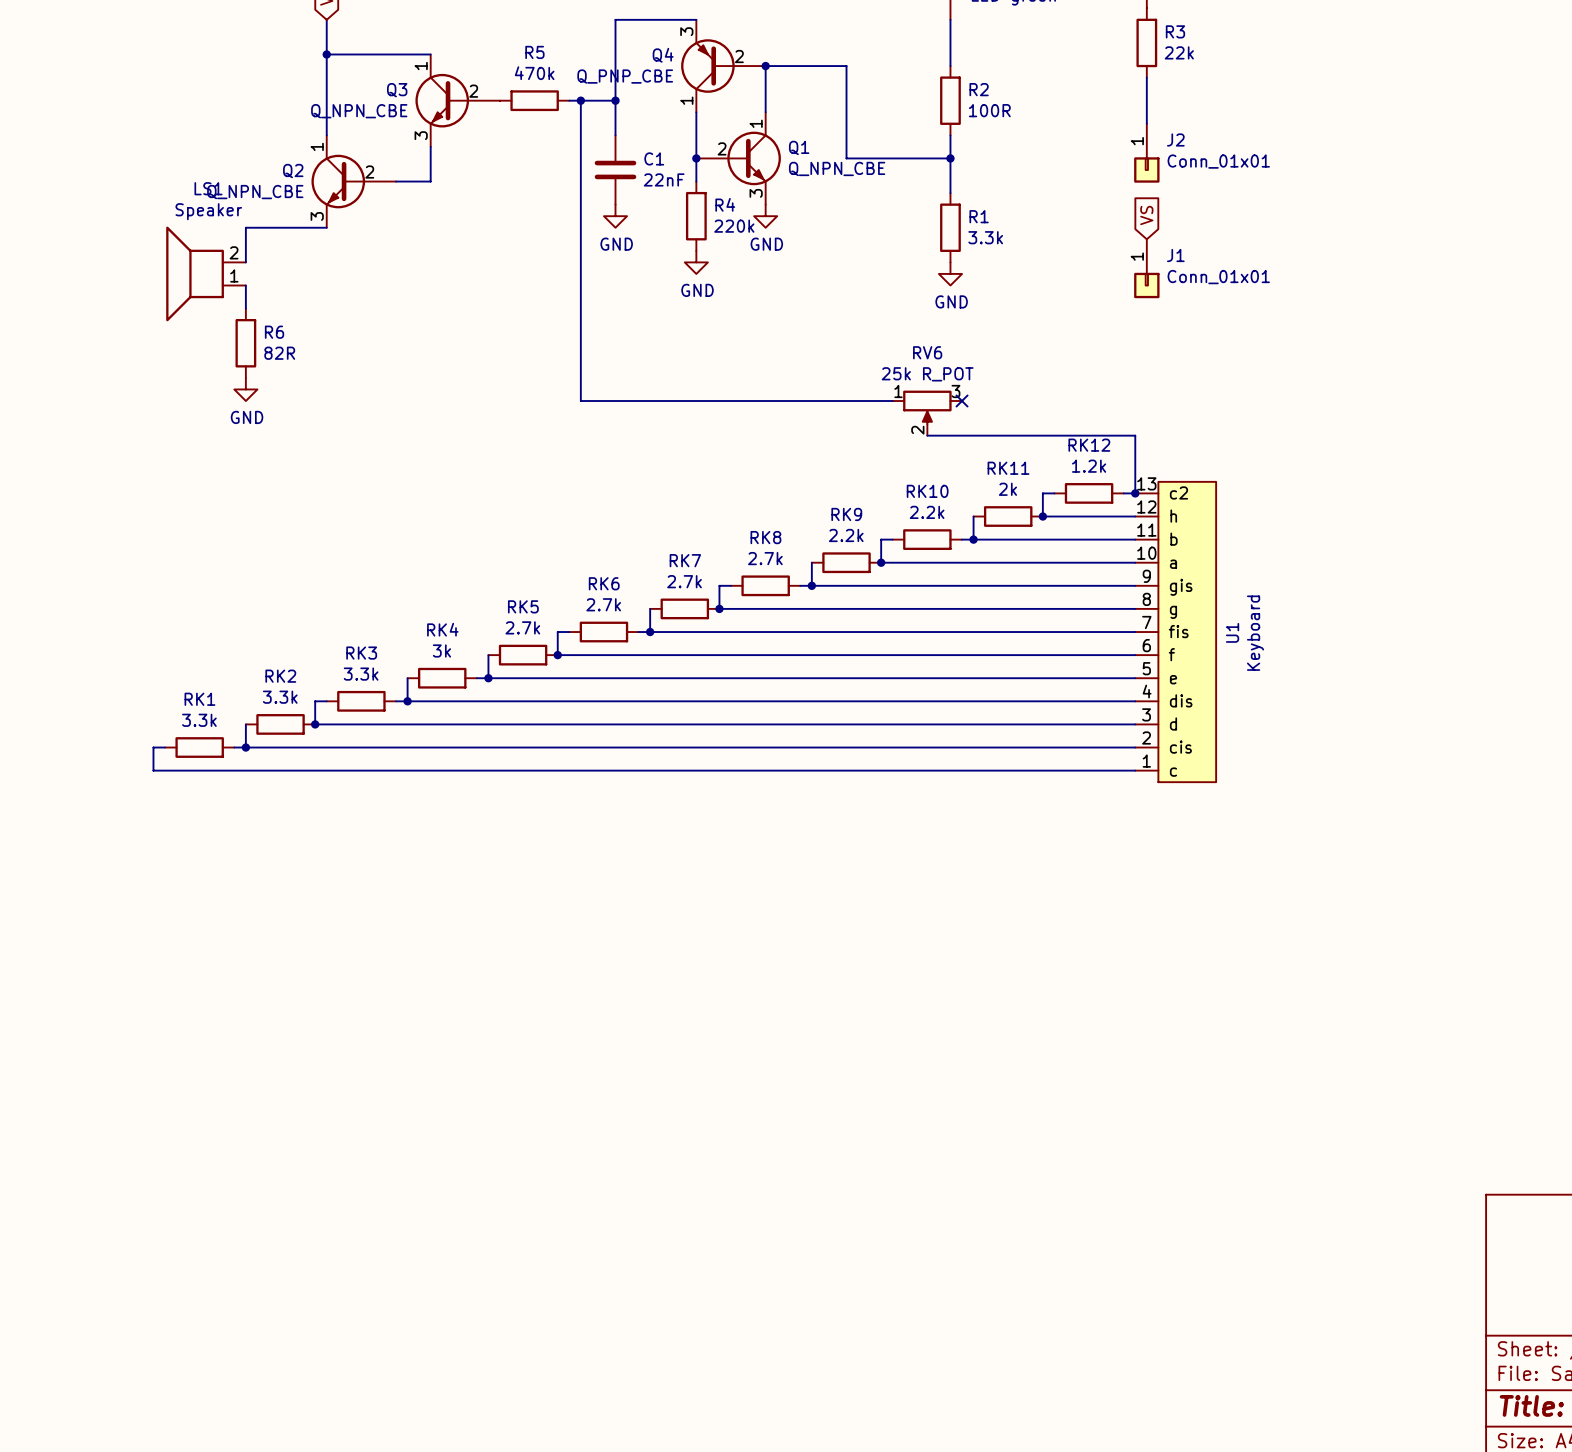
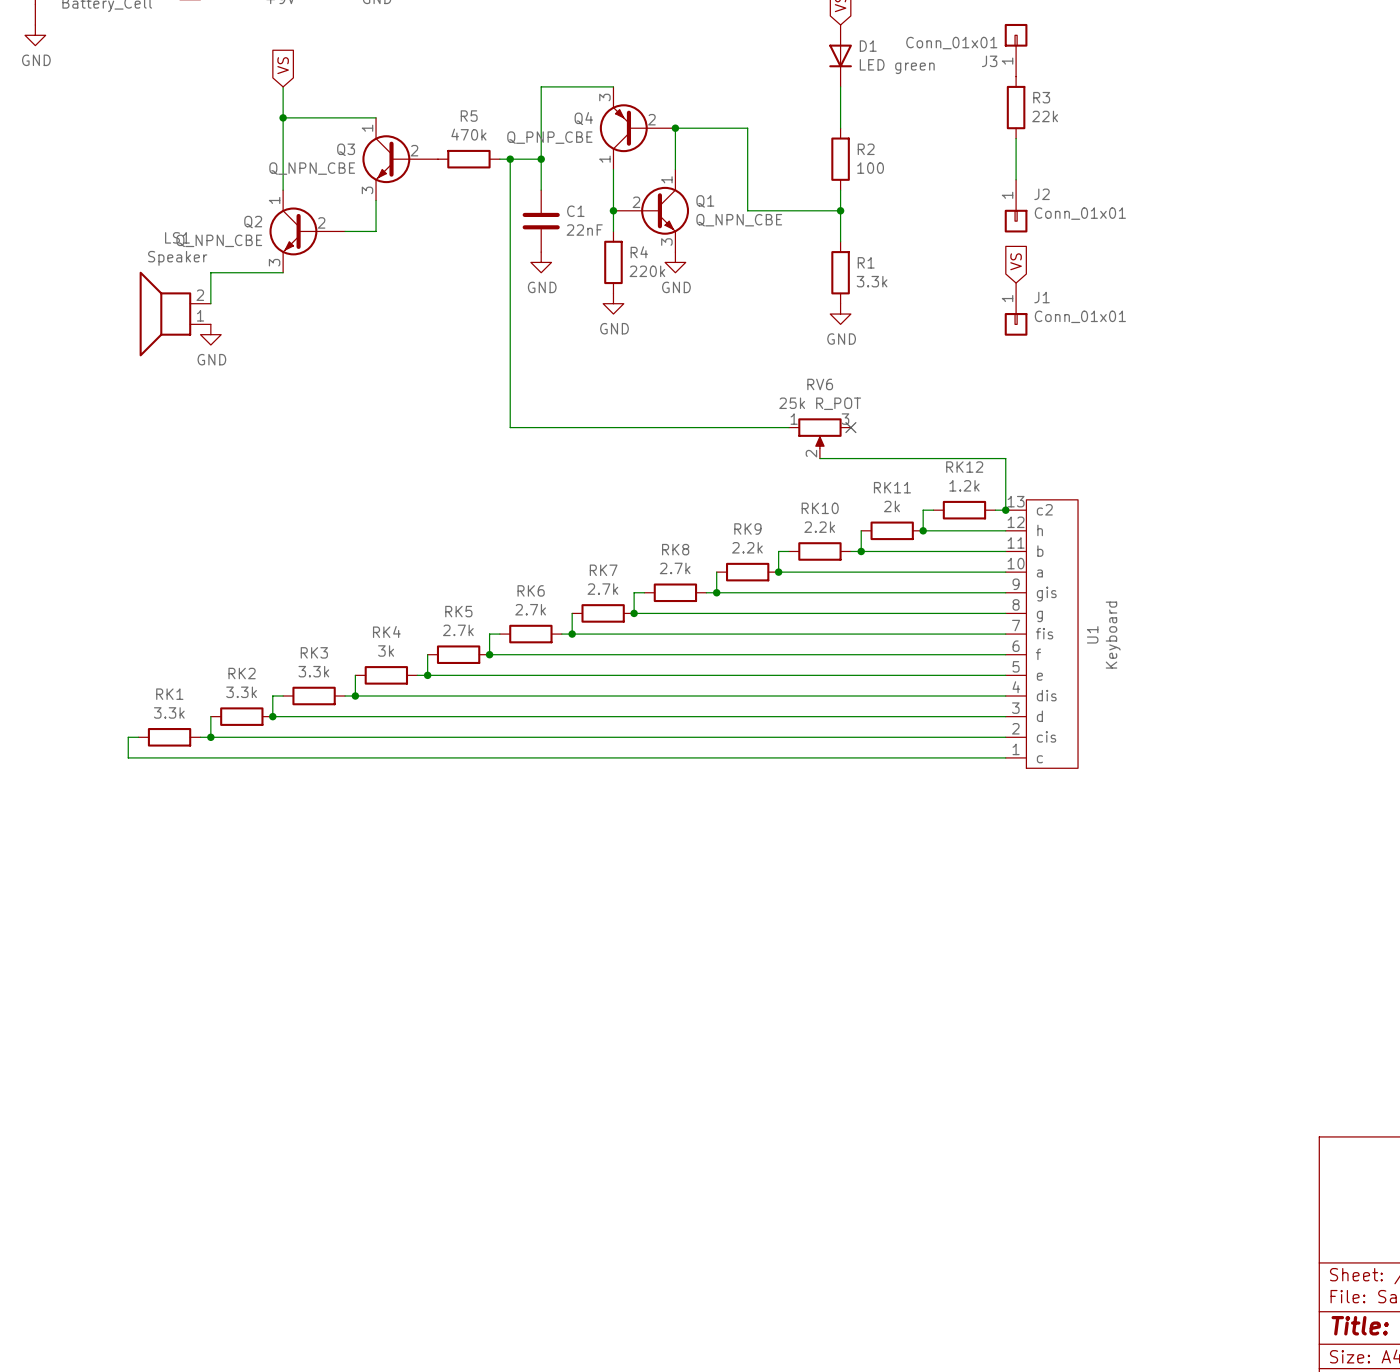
R2 value: 100R (989, 110) -> 100 (870, 168)
R6: 82R (245, 343) -> none
power symbol position: GND (245, 389) -> GND (210, 334)

